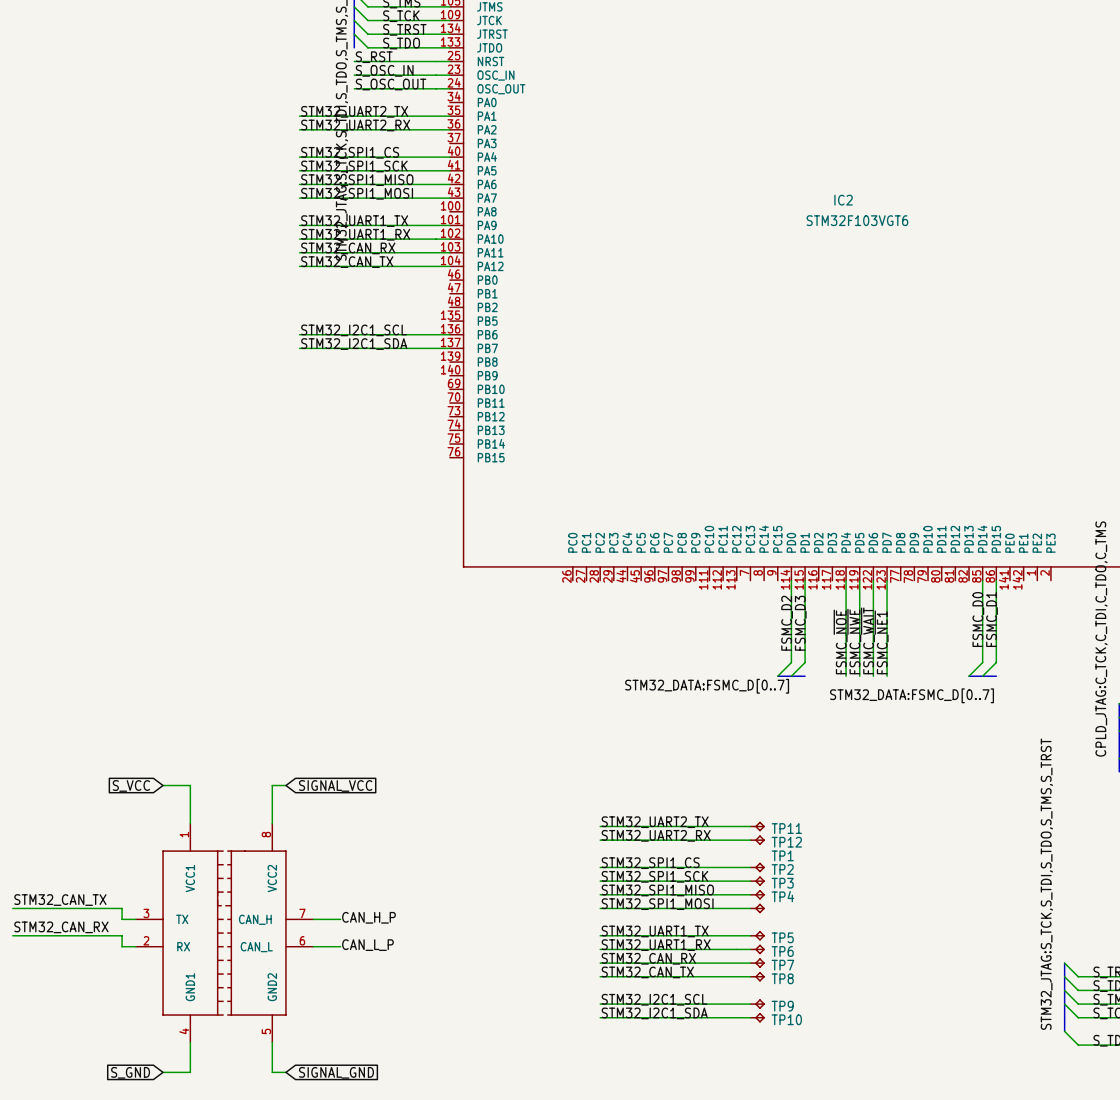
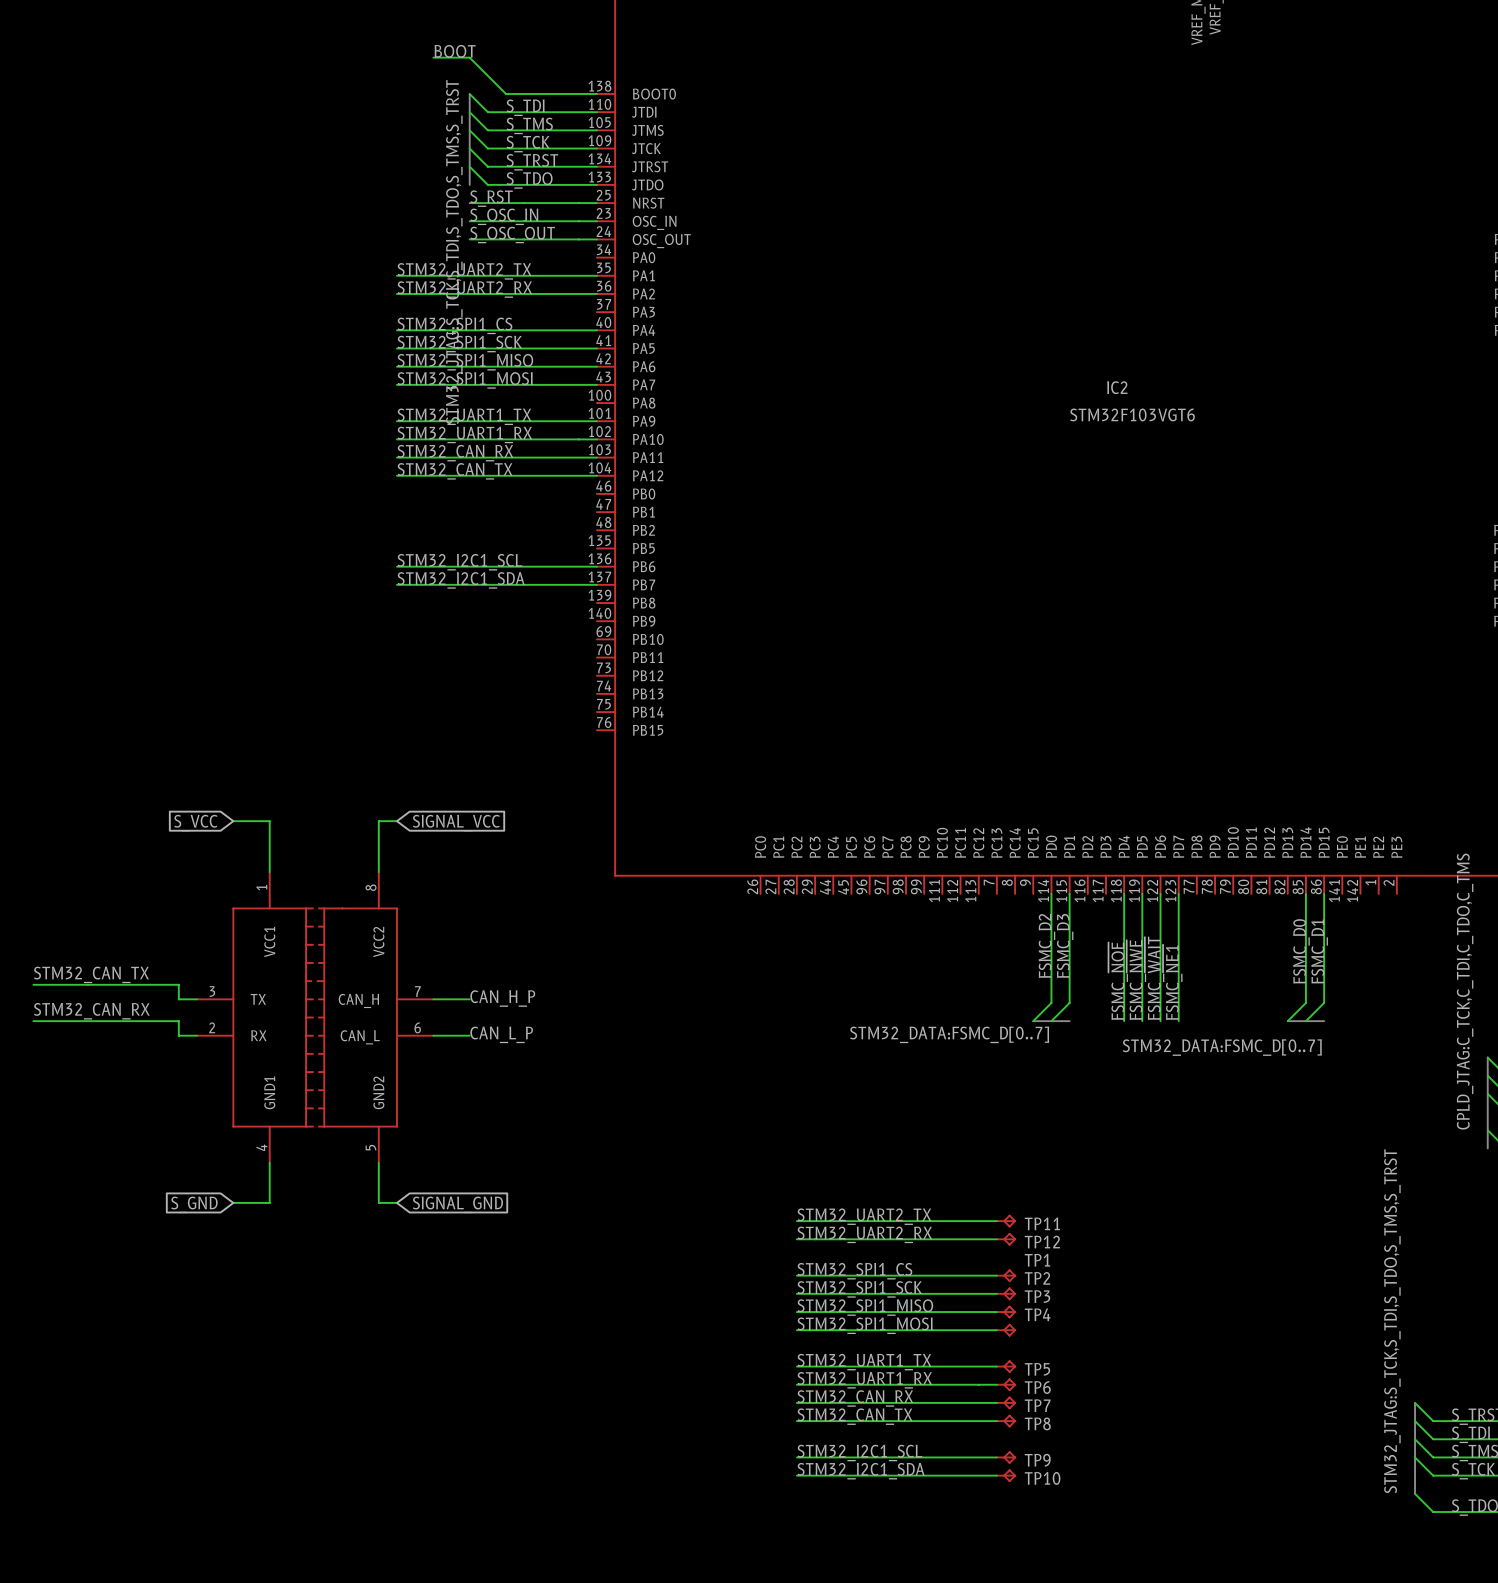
wire: none -> (233, 821) (269, 821) (269, 872)
wire: none -> (396, 821) (378, 821) (378, 872)
global label: none -> S_VCC (195, 823)
global label: none -> SIGNAL_VCC (456, 823)
label: none -> STM32_CAN_TX (91, 974)
wire: none -> (33, 984) (178, 984) (178, 999) (197, 999)
label: none -> CAN_H_P (502, 998)
wire: none -> (433, 999) (469, 999)
label: none -> STM32_CAN_RX (91, 1011)
part: none -> (315, 1017)
wire: none -> (33, 1021) (178, 1021) (178, 1035) (197, 1035)
label: none -> CAN_L_P (501, 1034)
wire: none -> (433, 1035) (469, 1035)
wire: none -> (269, 1162) (269, 1202) (233, 1202)
wire: none -> (378, 1162) (378, 1202) (396, 1202)
global label: S_VCC (131, 785) -> none
wire: (163, 785) (190, 785) (190, 823) -> none
wire: (285, 785) (272, 785) (272, 823) -> none
global label: SIGNAL_VCC (335, 785) -> none
global label: none -> S_GND (194, 1204)
global label: none -> SIGNAL_GND (457, 1204)
label: STM32_CAN_TX (60, 900) -> none
wire: (12, 908) (122, 908) (122, 919) (135, 919) -> none
label: CAN_H_P (368, 917) -> none
wire: (313, 919) (340, 919) -> none
label: STM32_CAN_RX (61, 927) -> none
part: (224, 933) -> none
wire: (12, 935) (122, 935) (122, 946) (135, 946) -> none
label: CAN_L_P (367, 945) -> none
wire: (313, 946) (340, 946) -> none
wire: (190, 1042) (190, 1072) (163, 1072) -> none
wire: (272, 1042) (272, 1072) (285, 1072) -> none
global label: S_GND (130, 1072) -> none
global label: SIGNAL_GND (336, 1072) -> none

